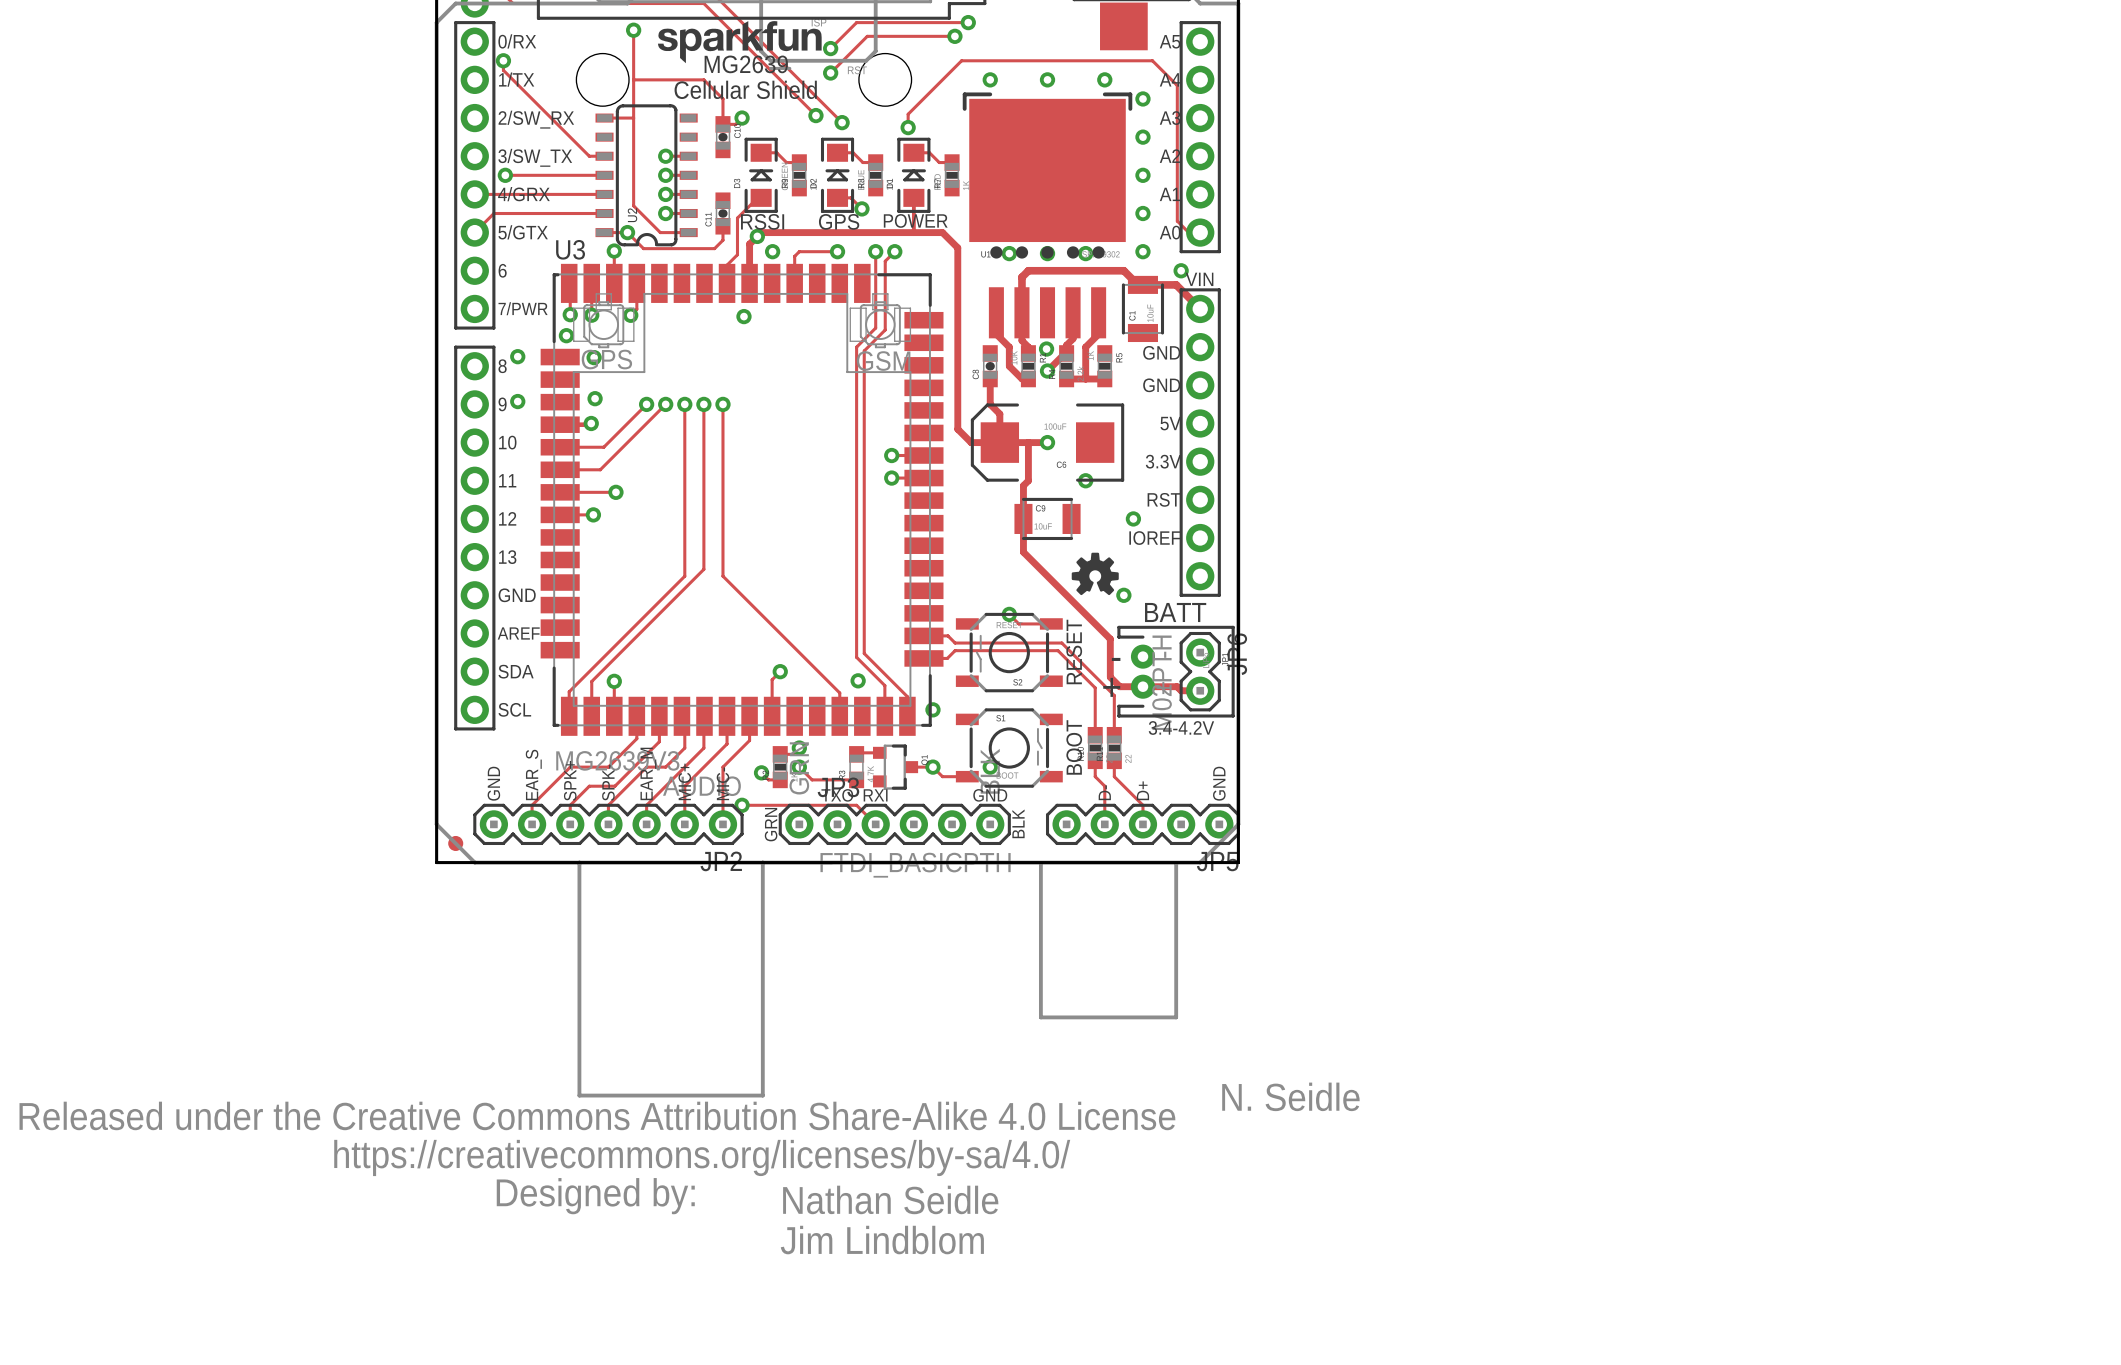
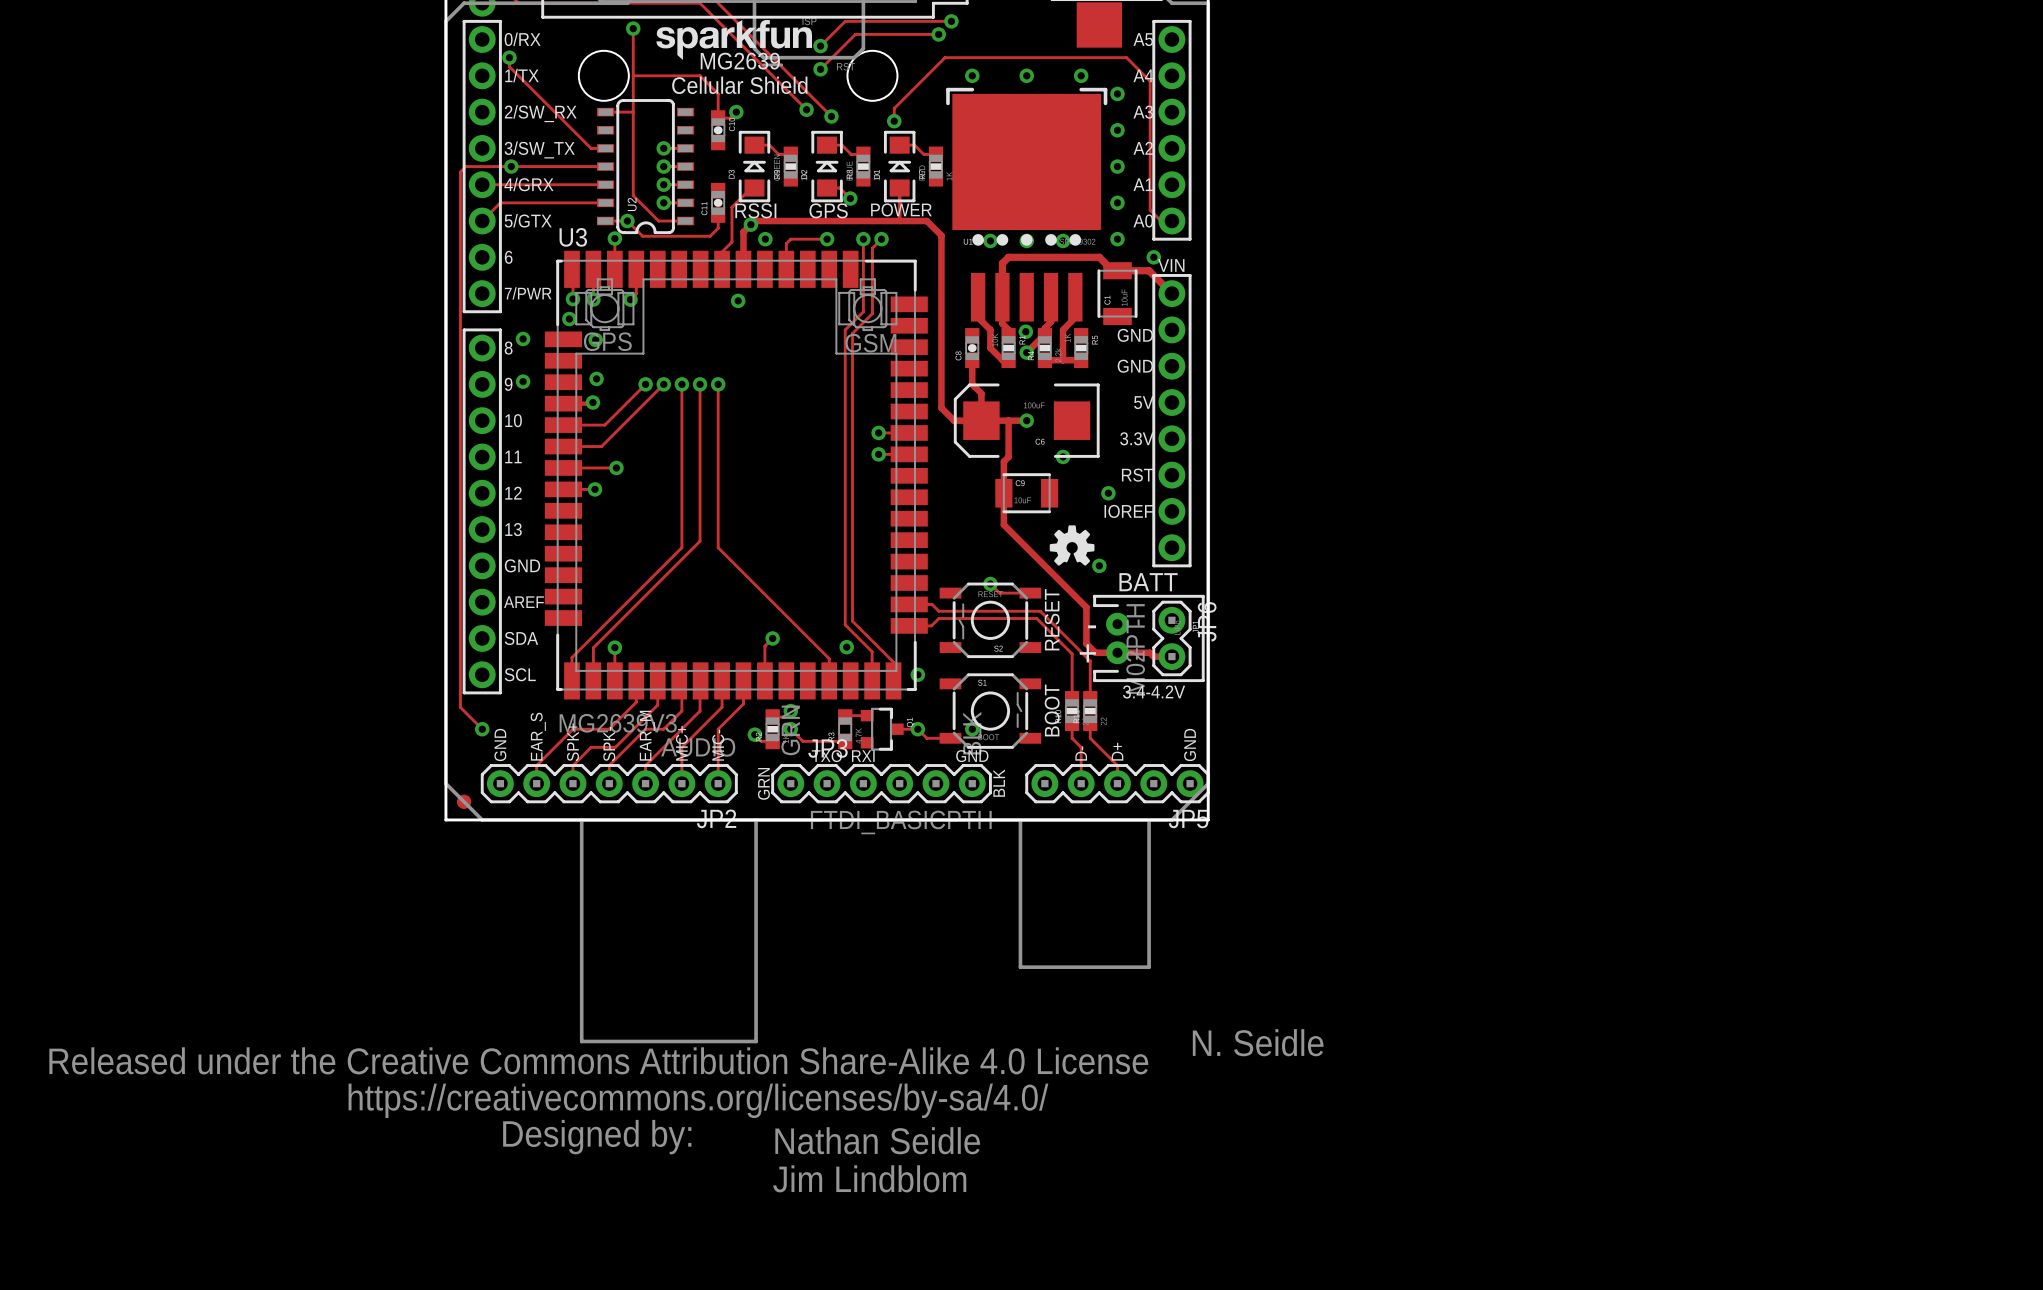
track: none -> (511, 166) (465, 166) (460, 172) (460, 707) (482, 729)
via: none -> (482, 729)
track: (742, 805) (856, 805) (875, 824) -> none
via: (742, 805) -> none

